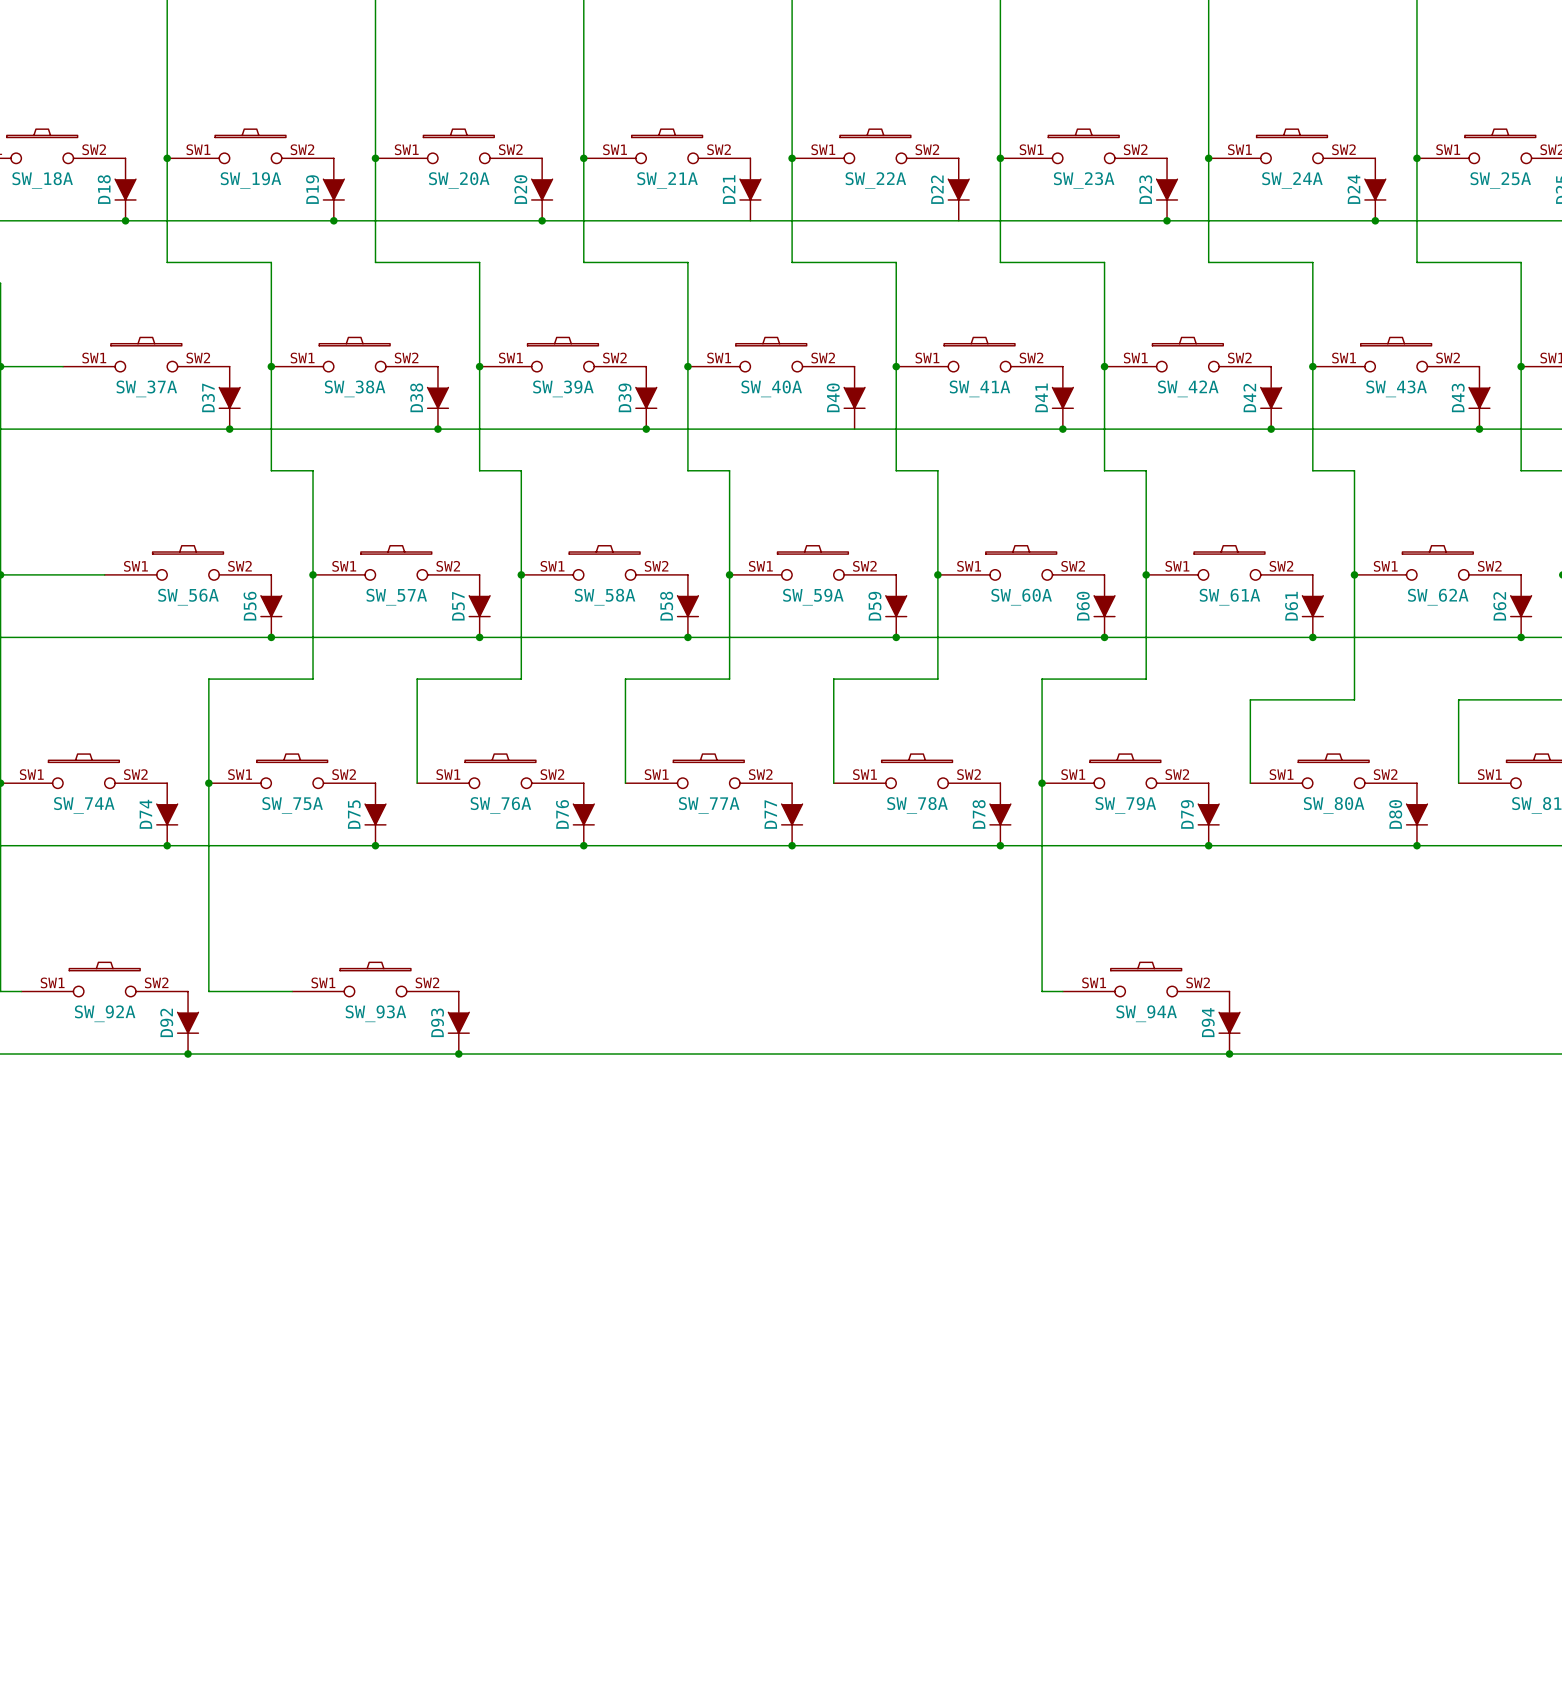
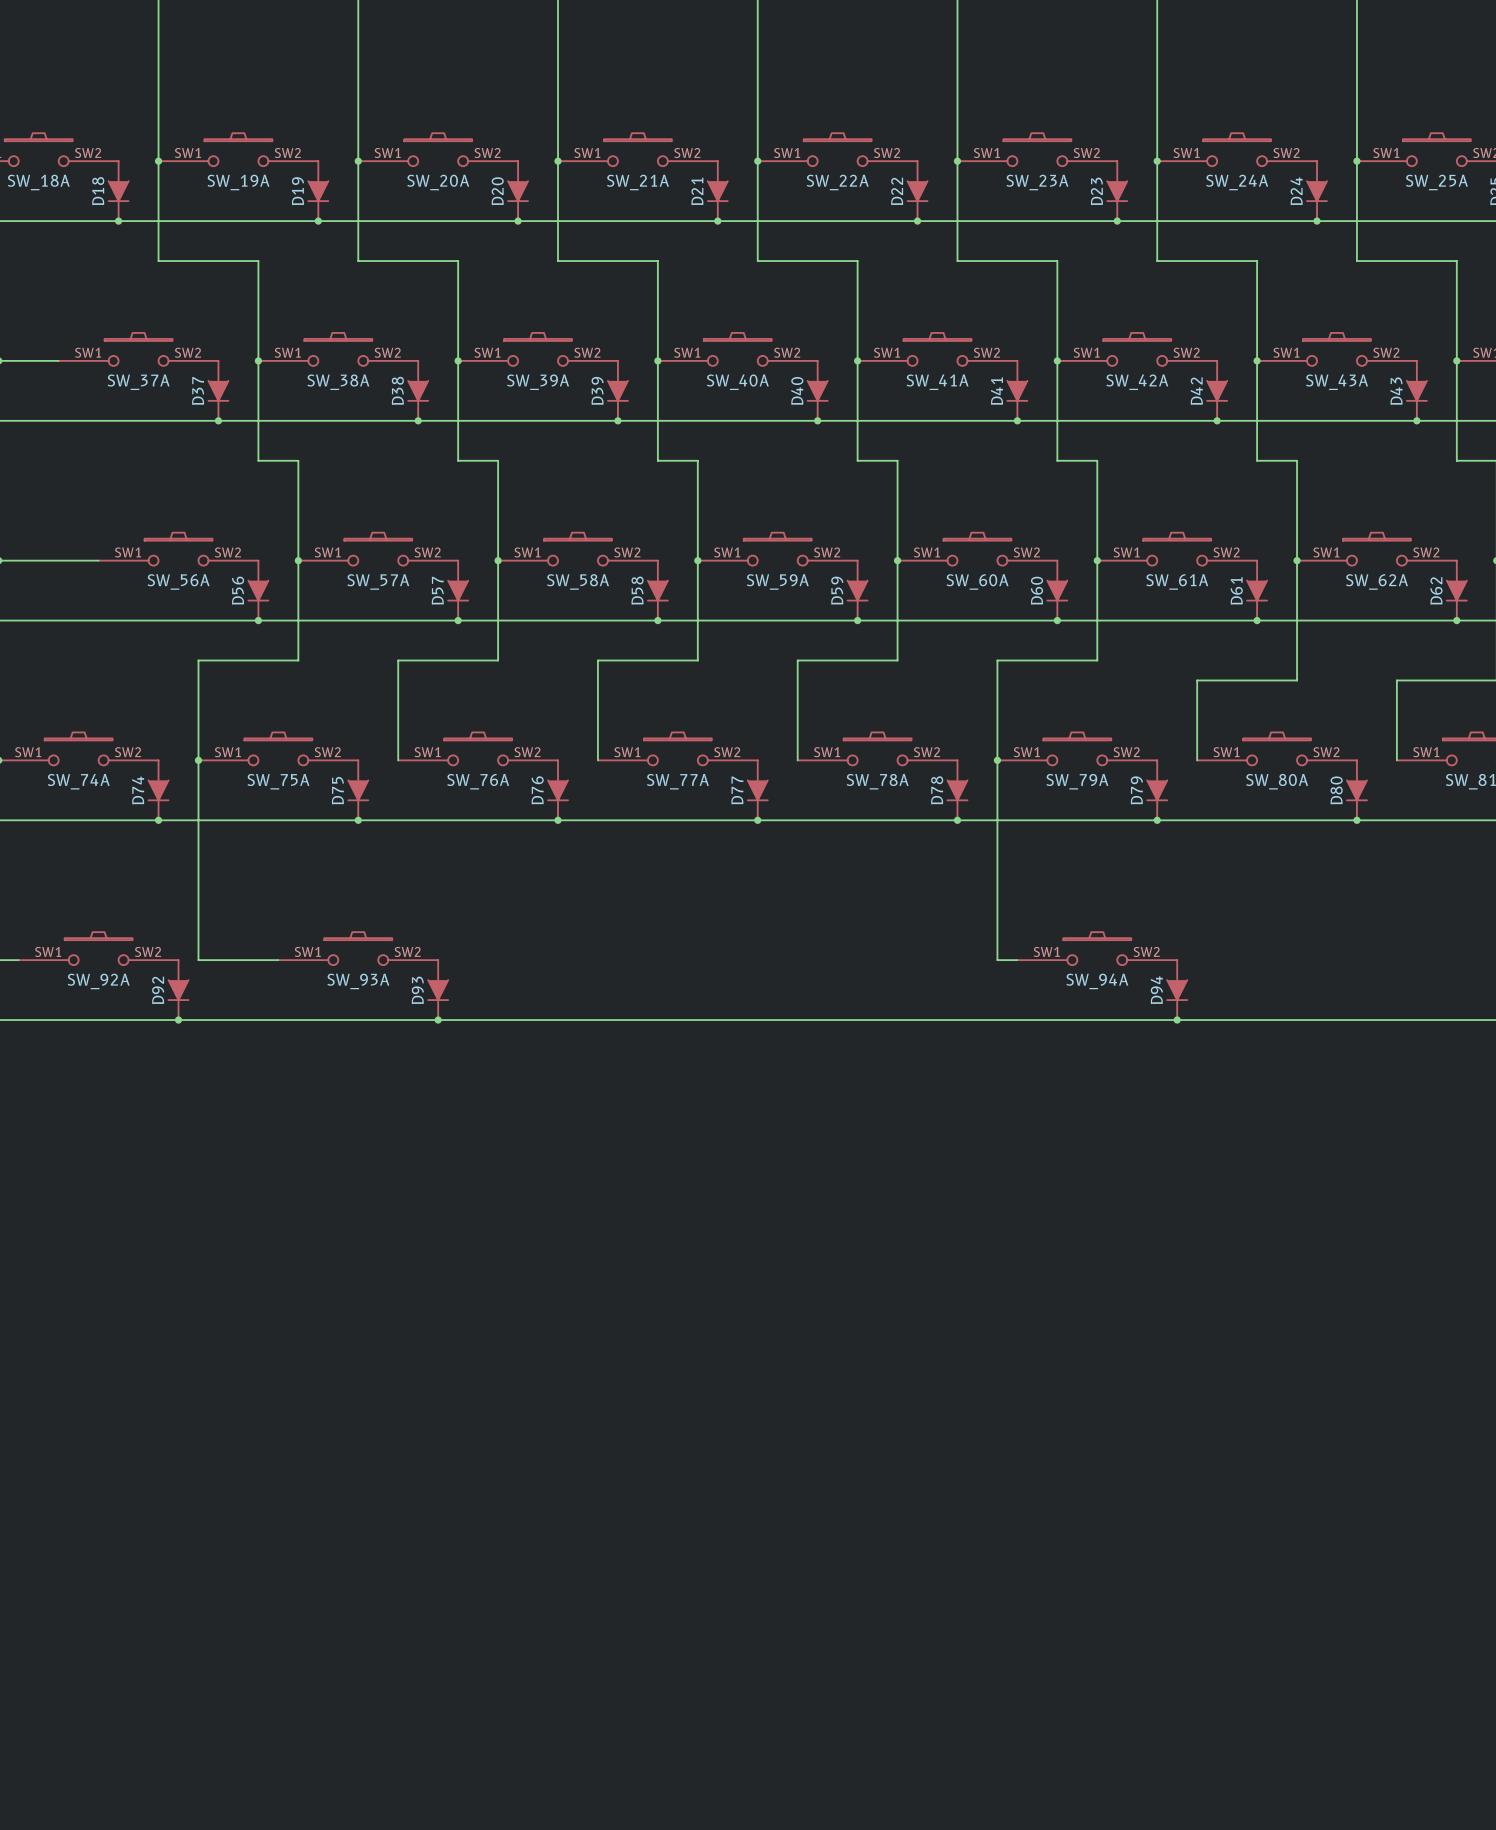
junction: none -> (717, 221)
junction: none -> (917, 221)
junction: none -> (817, 420)

